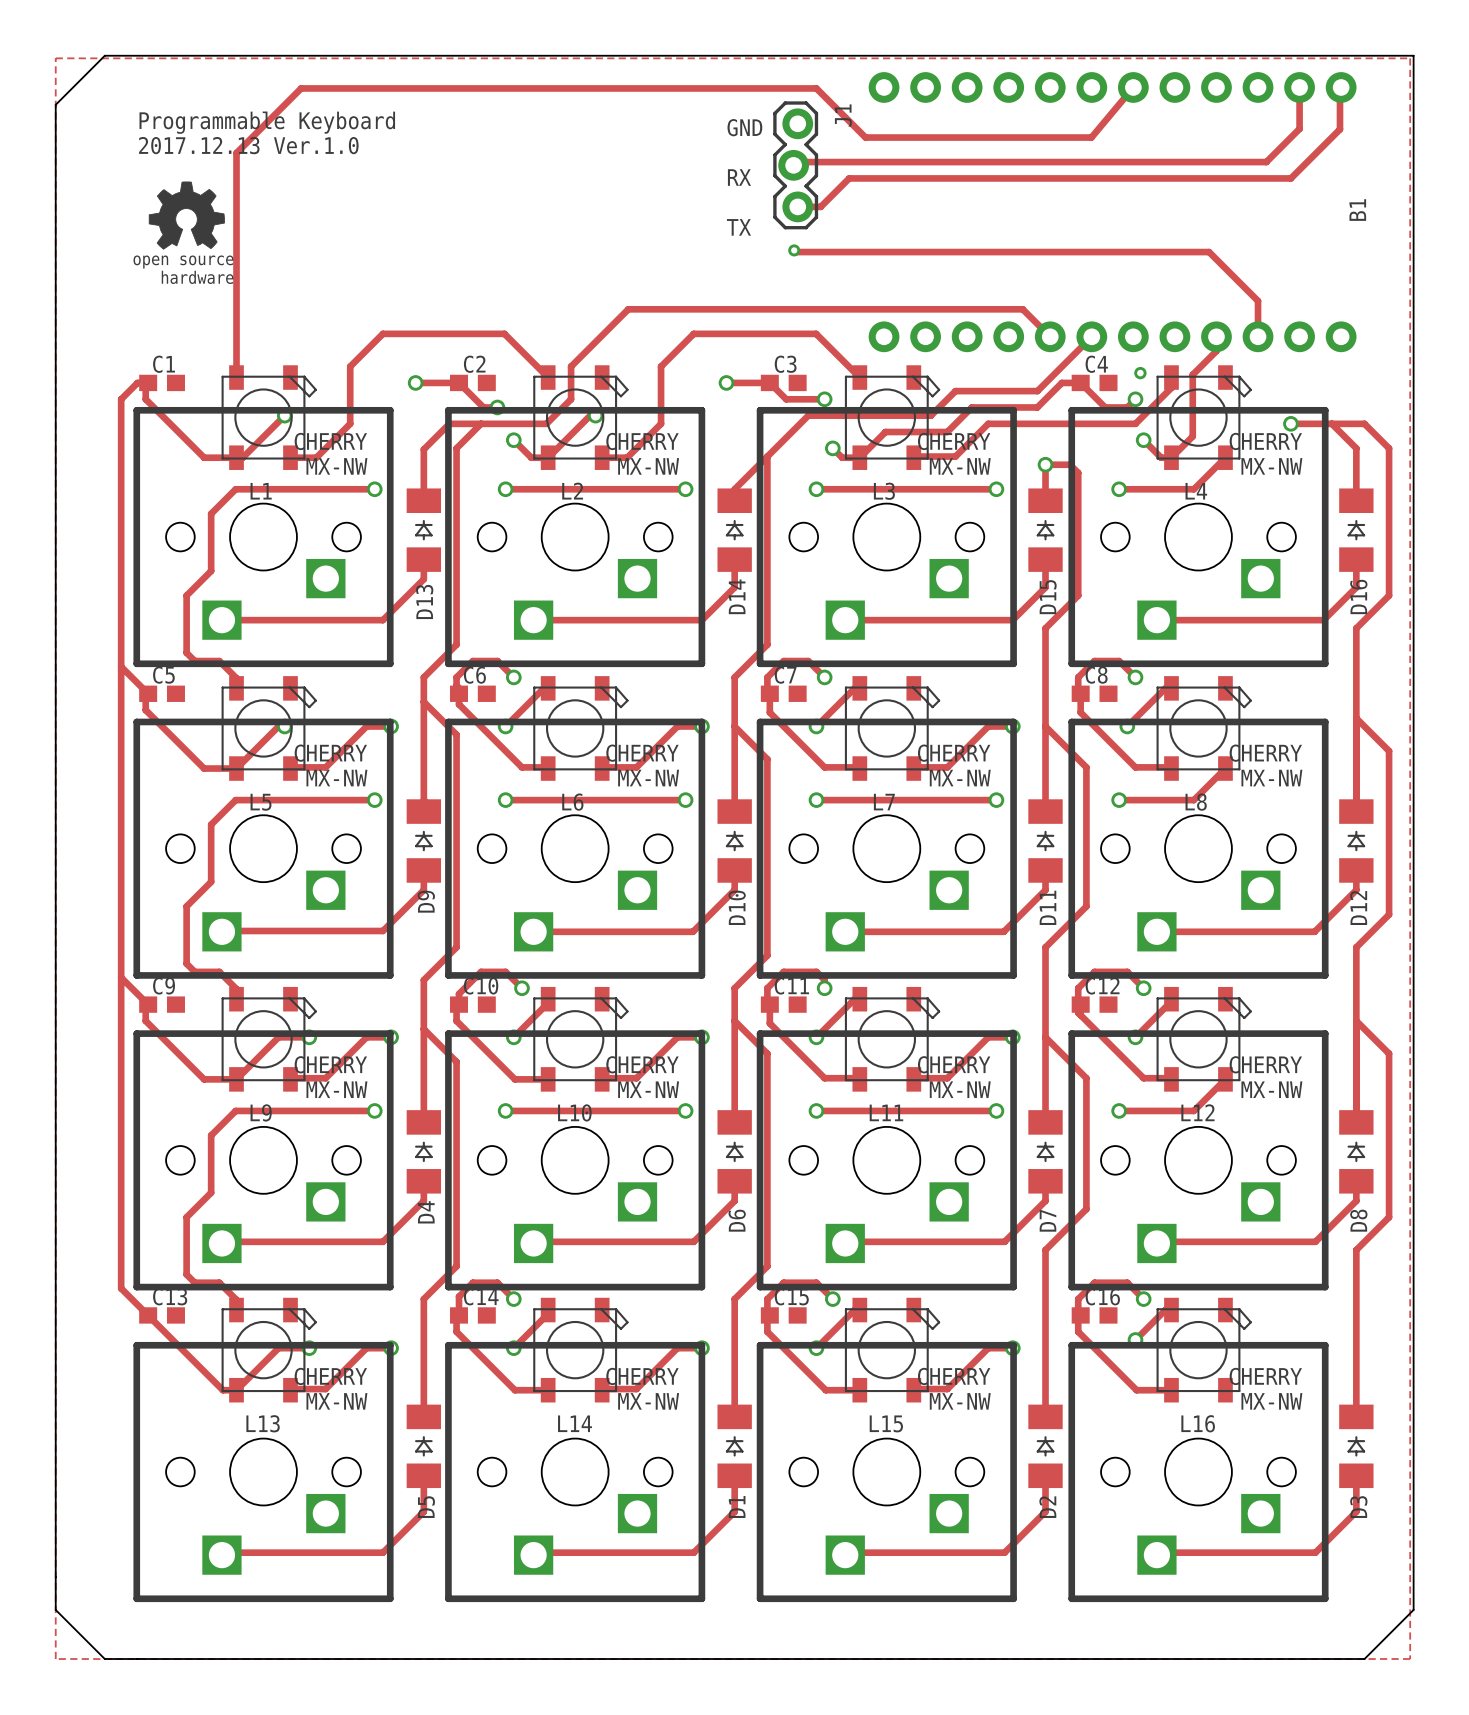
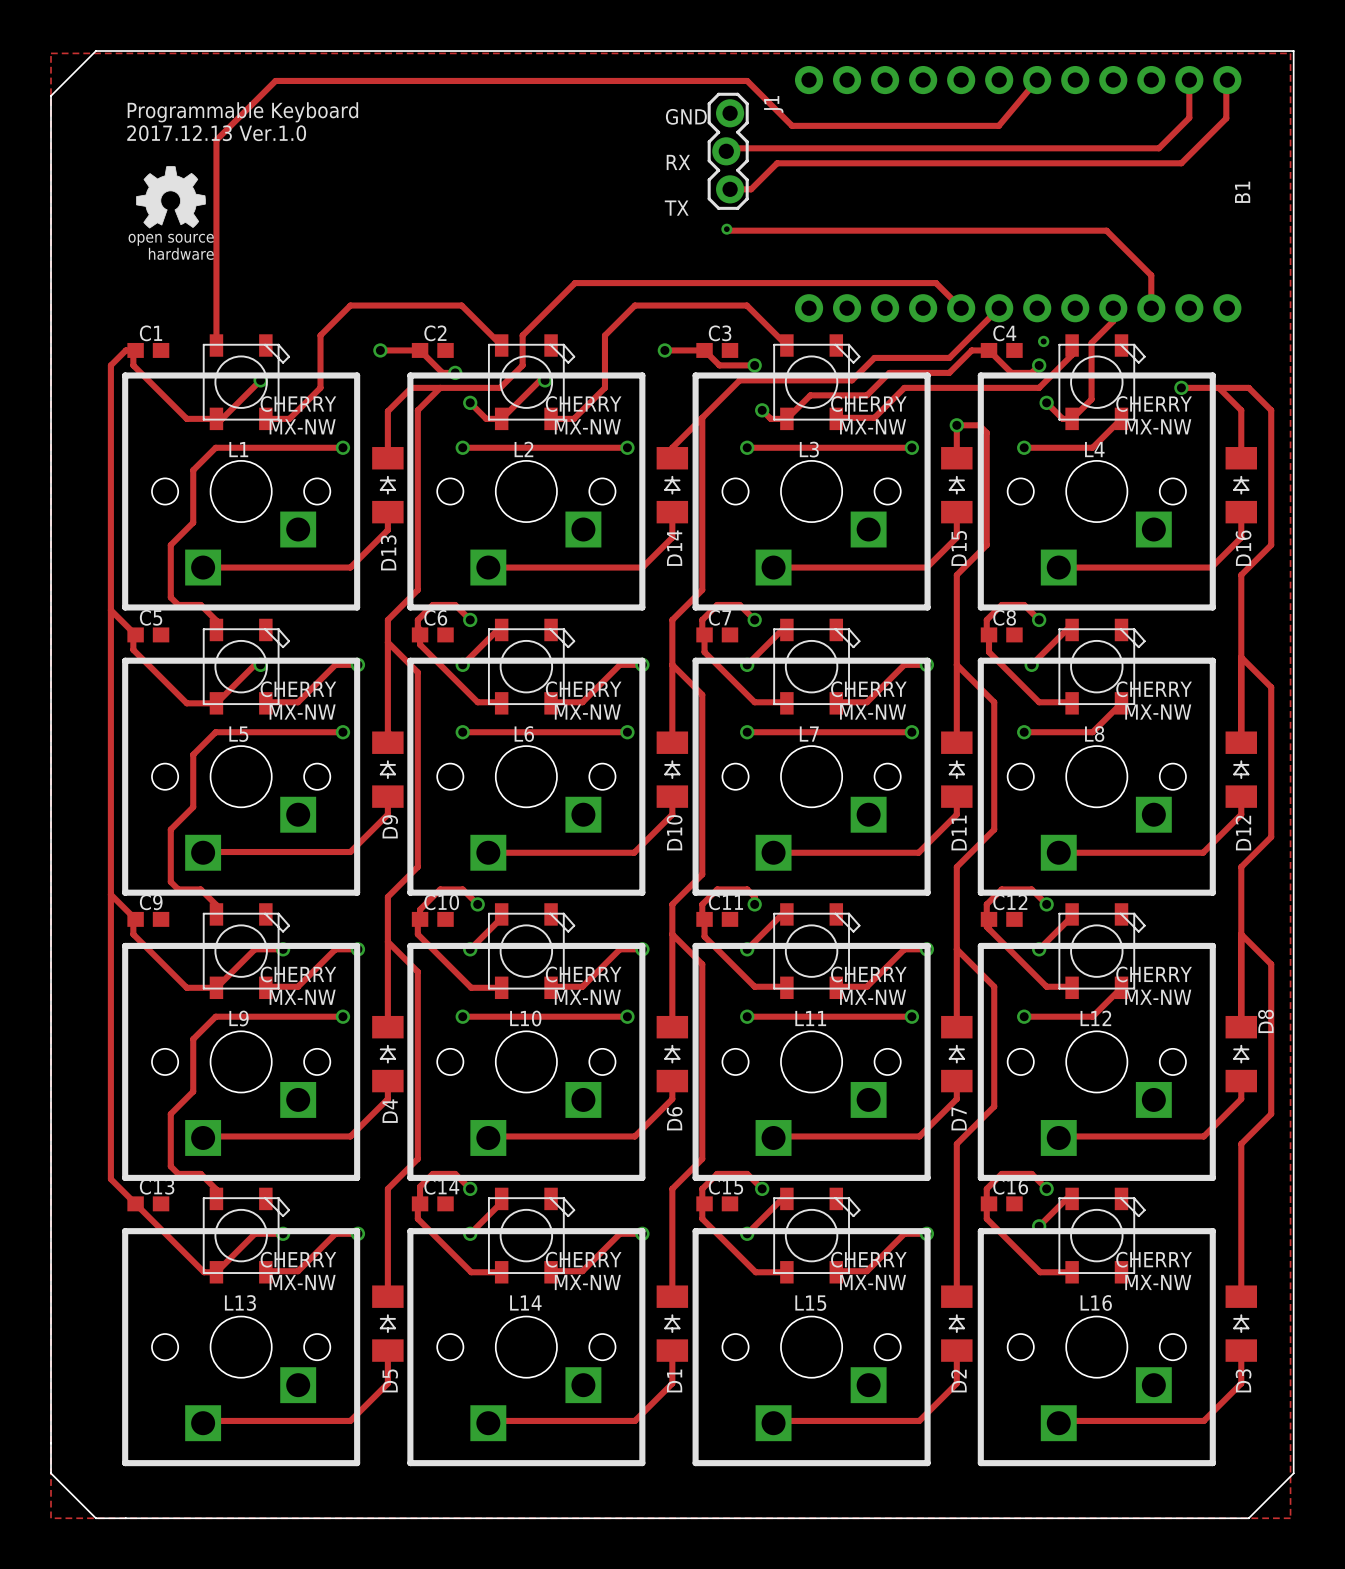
D8 name position: D8 (1358, 1220) -> D8 (1266, 1021)

